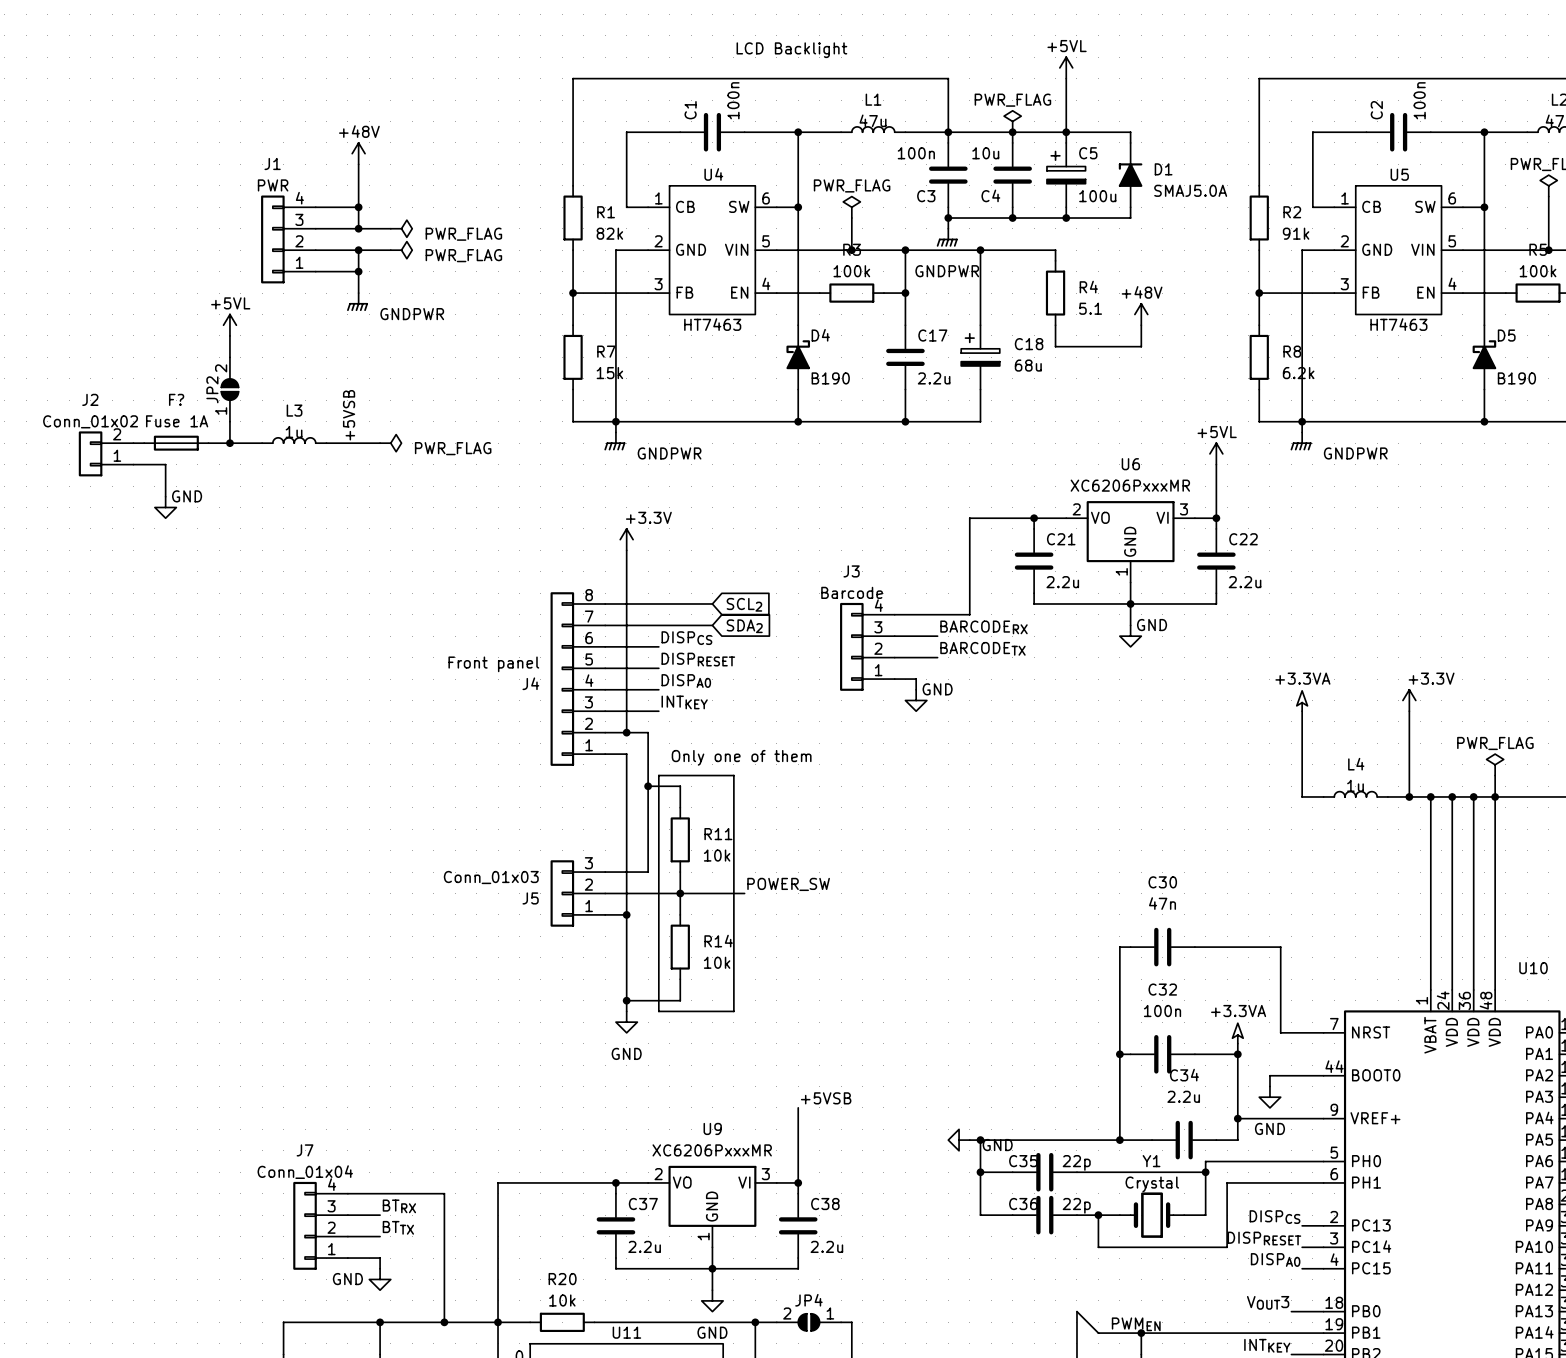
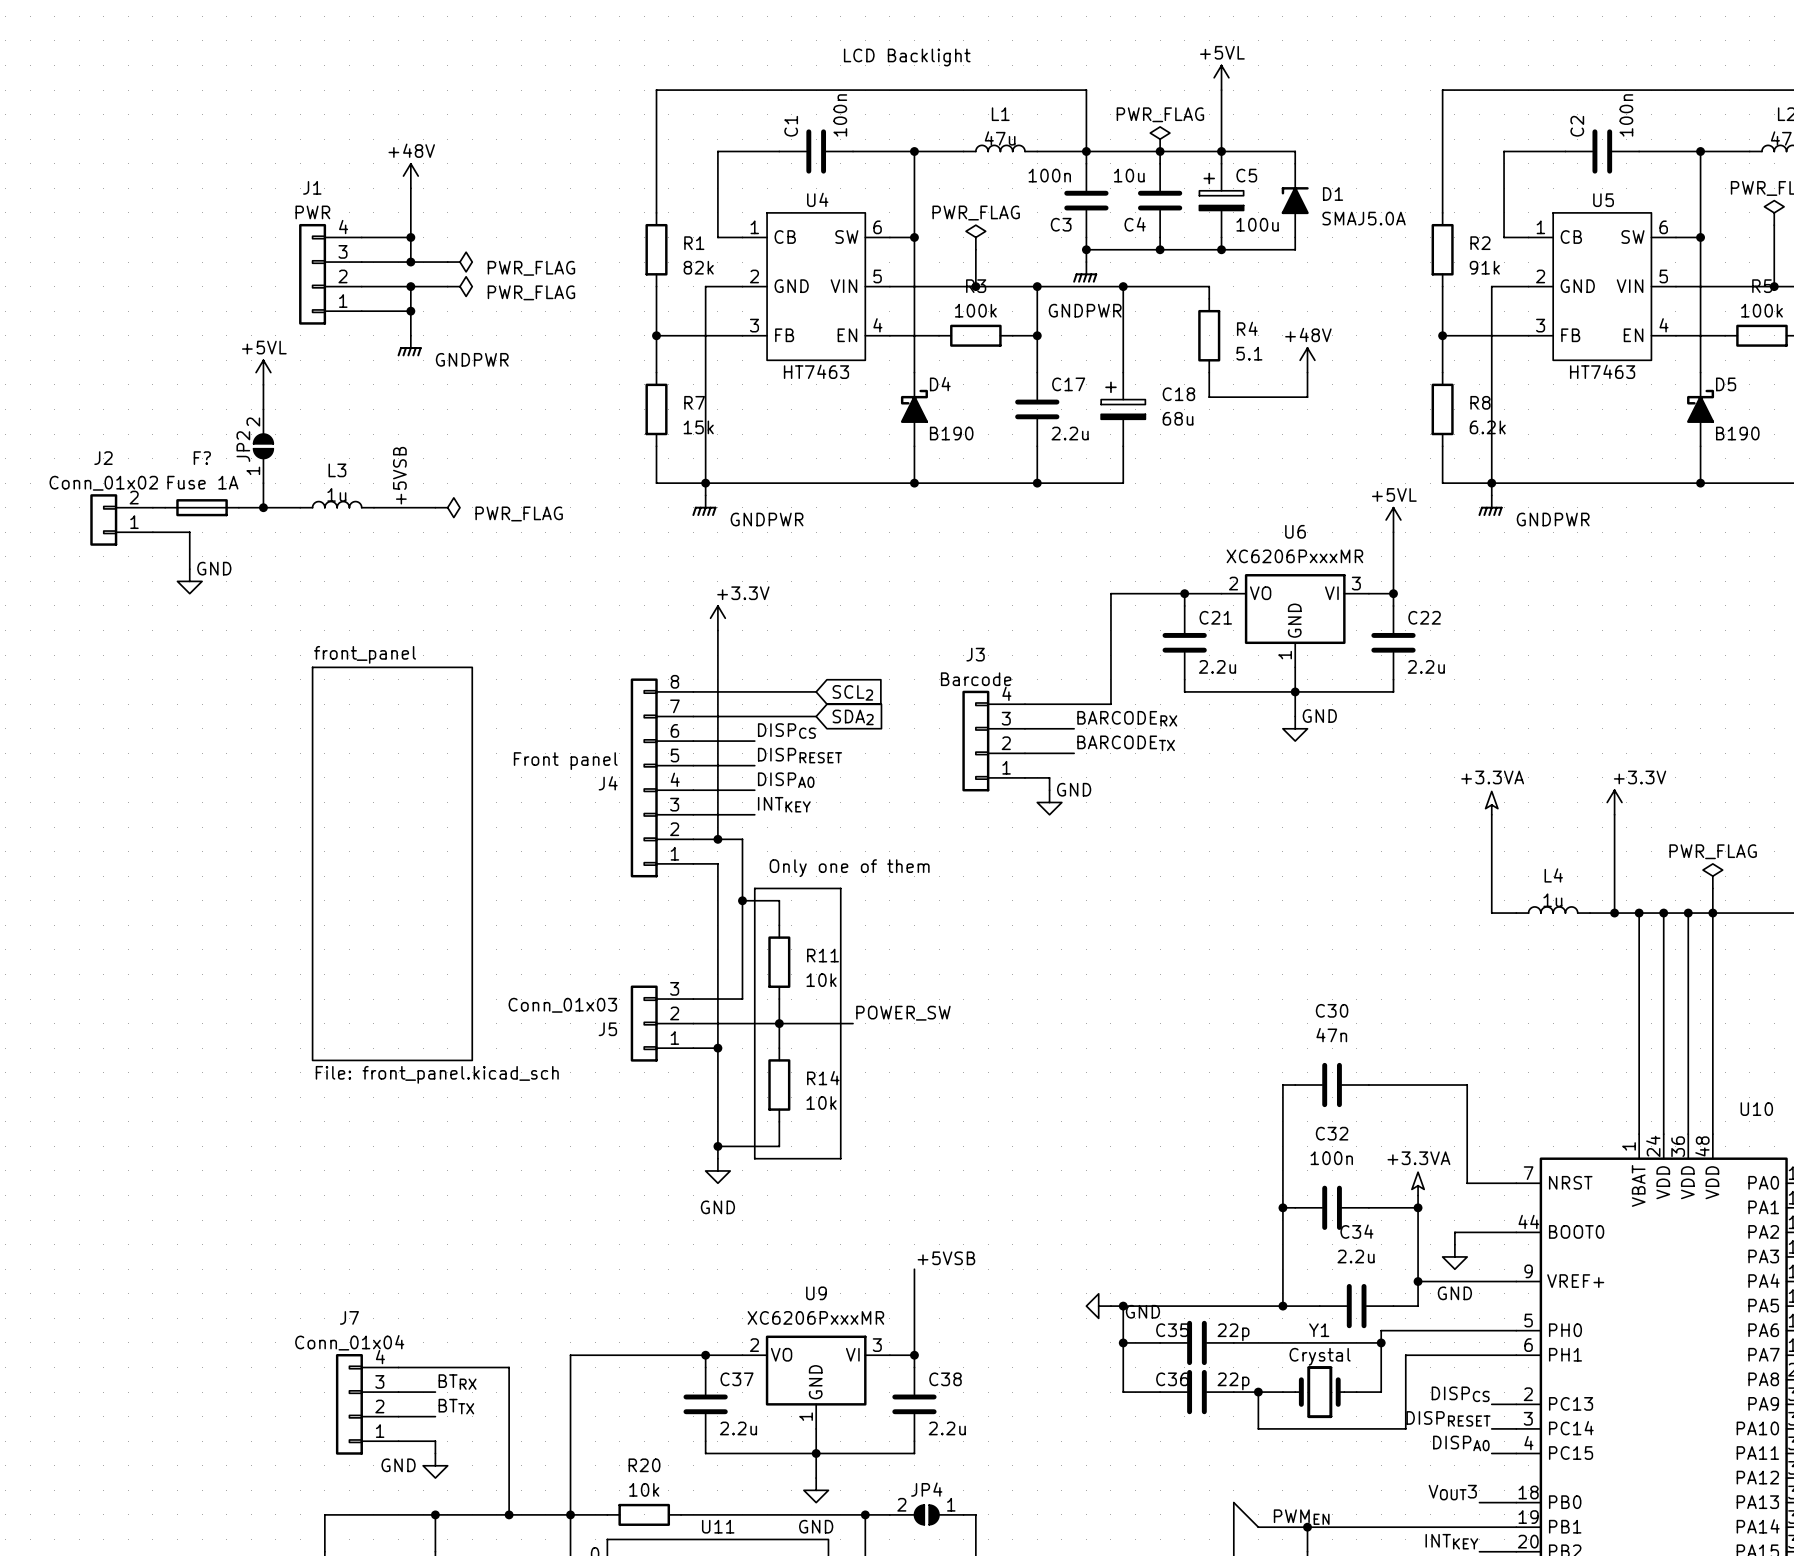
sheet front_panel: none -> File: front_panel.kicad_sch (392, 863)

